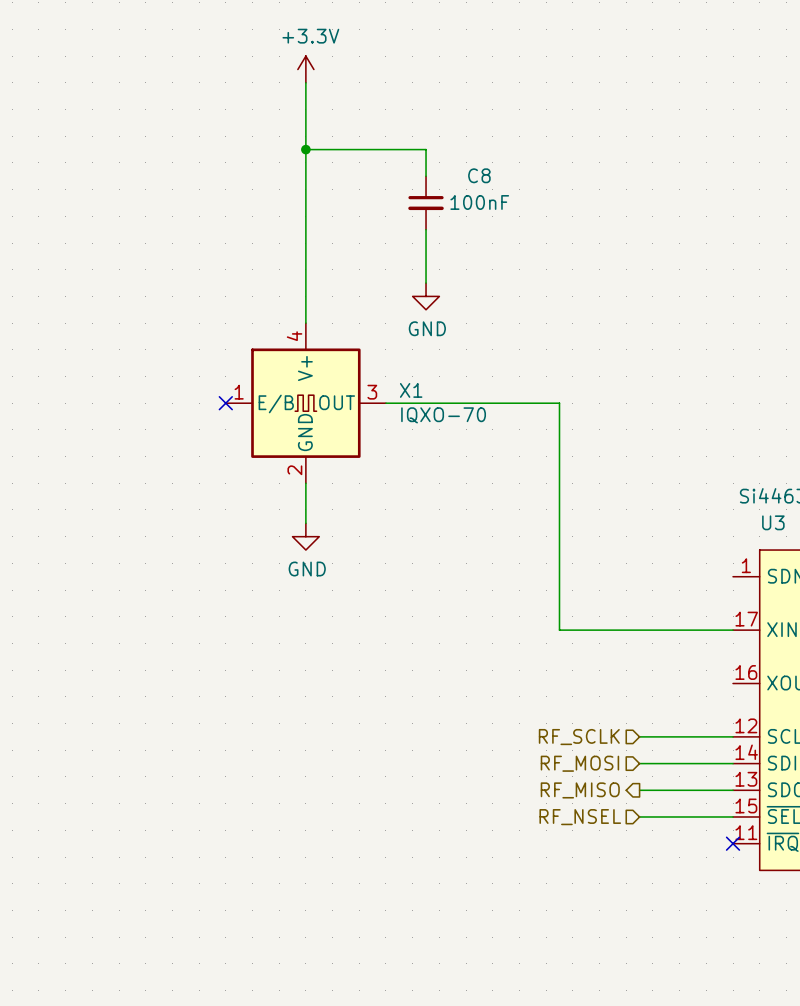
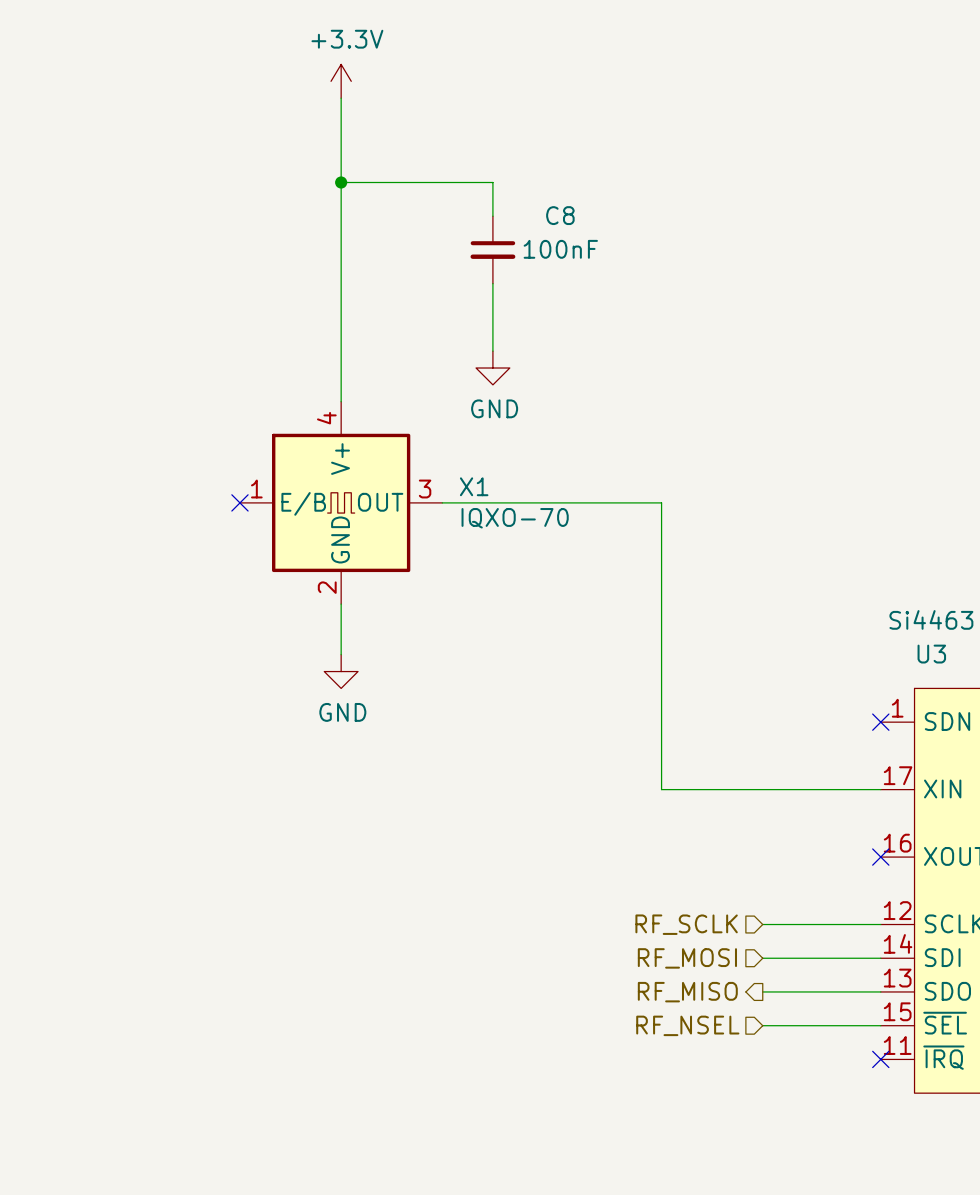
no-connect mark: none -> (880, 722)
no-connect mark: none -> (880, 857)

